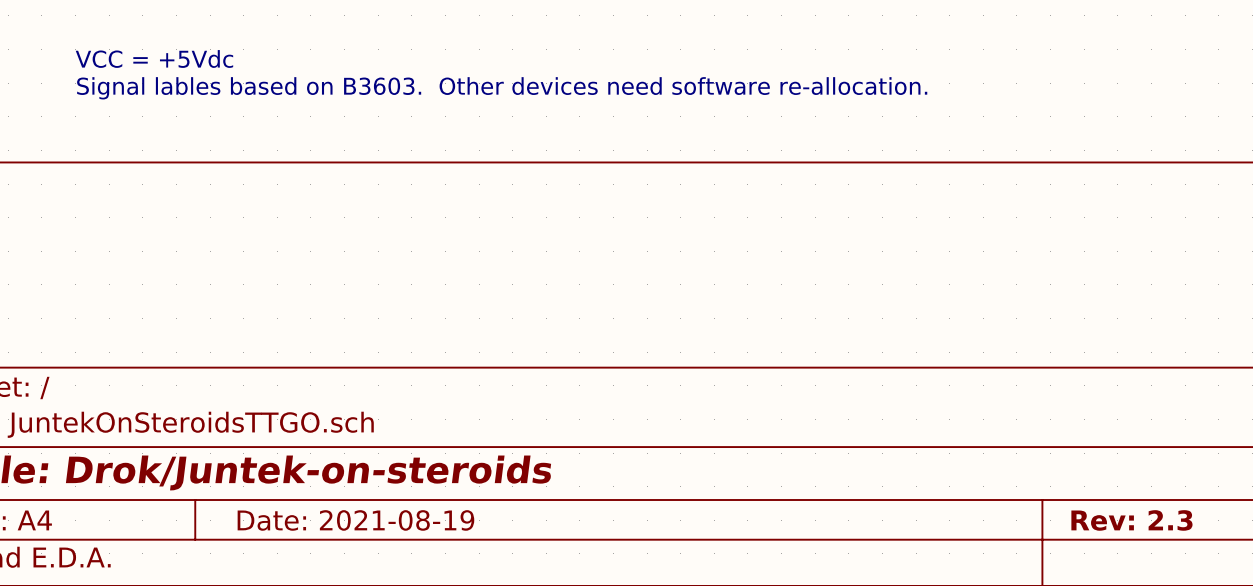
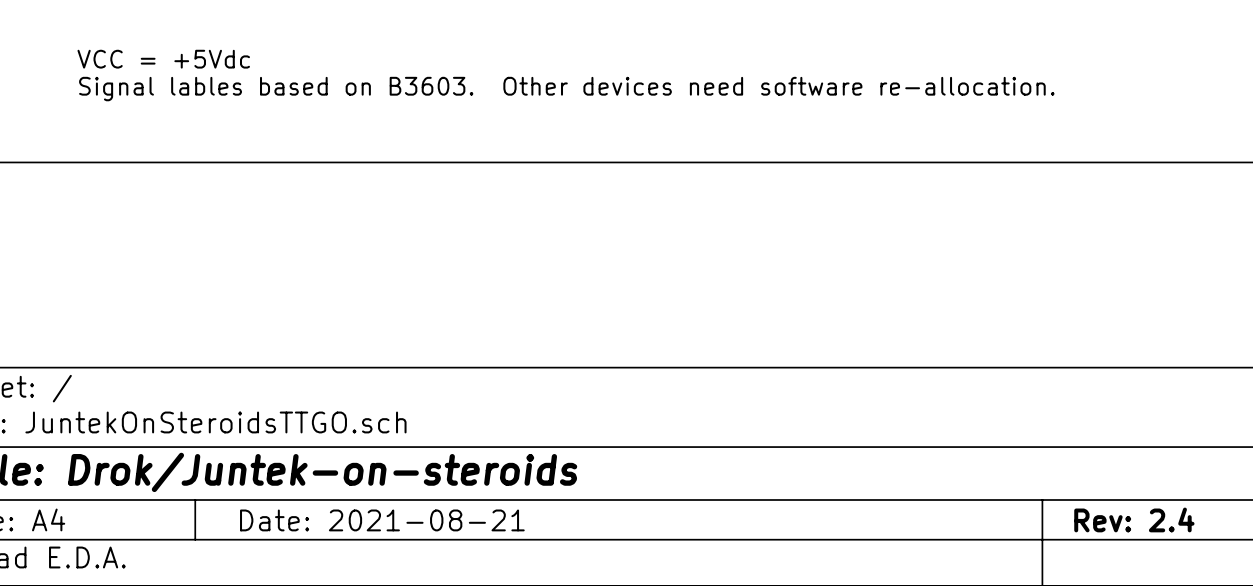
title block: Date: 2021-08-19 (355, 520) -> Date: 2021-08-21 (382, 520)
title block: Rev: 2.3 (1131, 520) -> Rev: 2.4 (1134, 519)

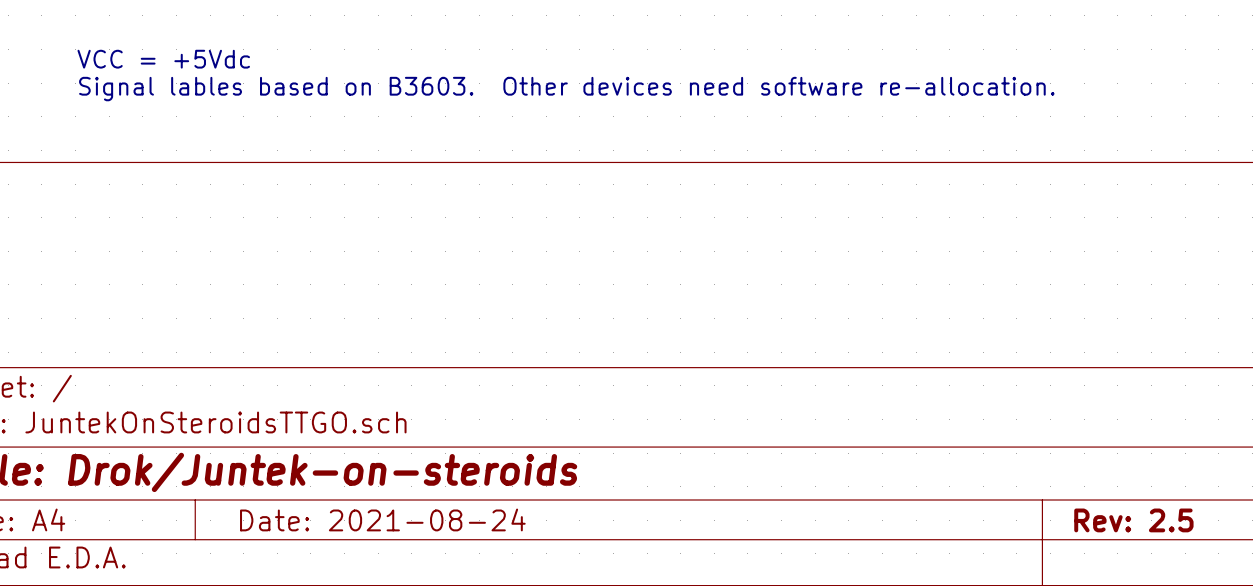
title block: Rev: 2.4 (1134, 519) -> Rev: 2.5 (1133, 520)
title block: Date: 2021-08-21 (382, 520) -> Date: 2021-08-24 (382, 519)

